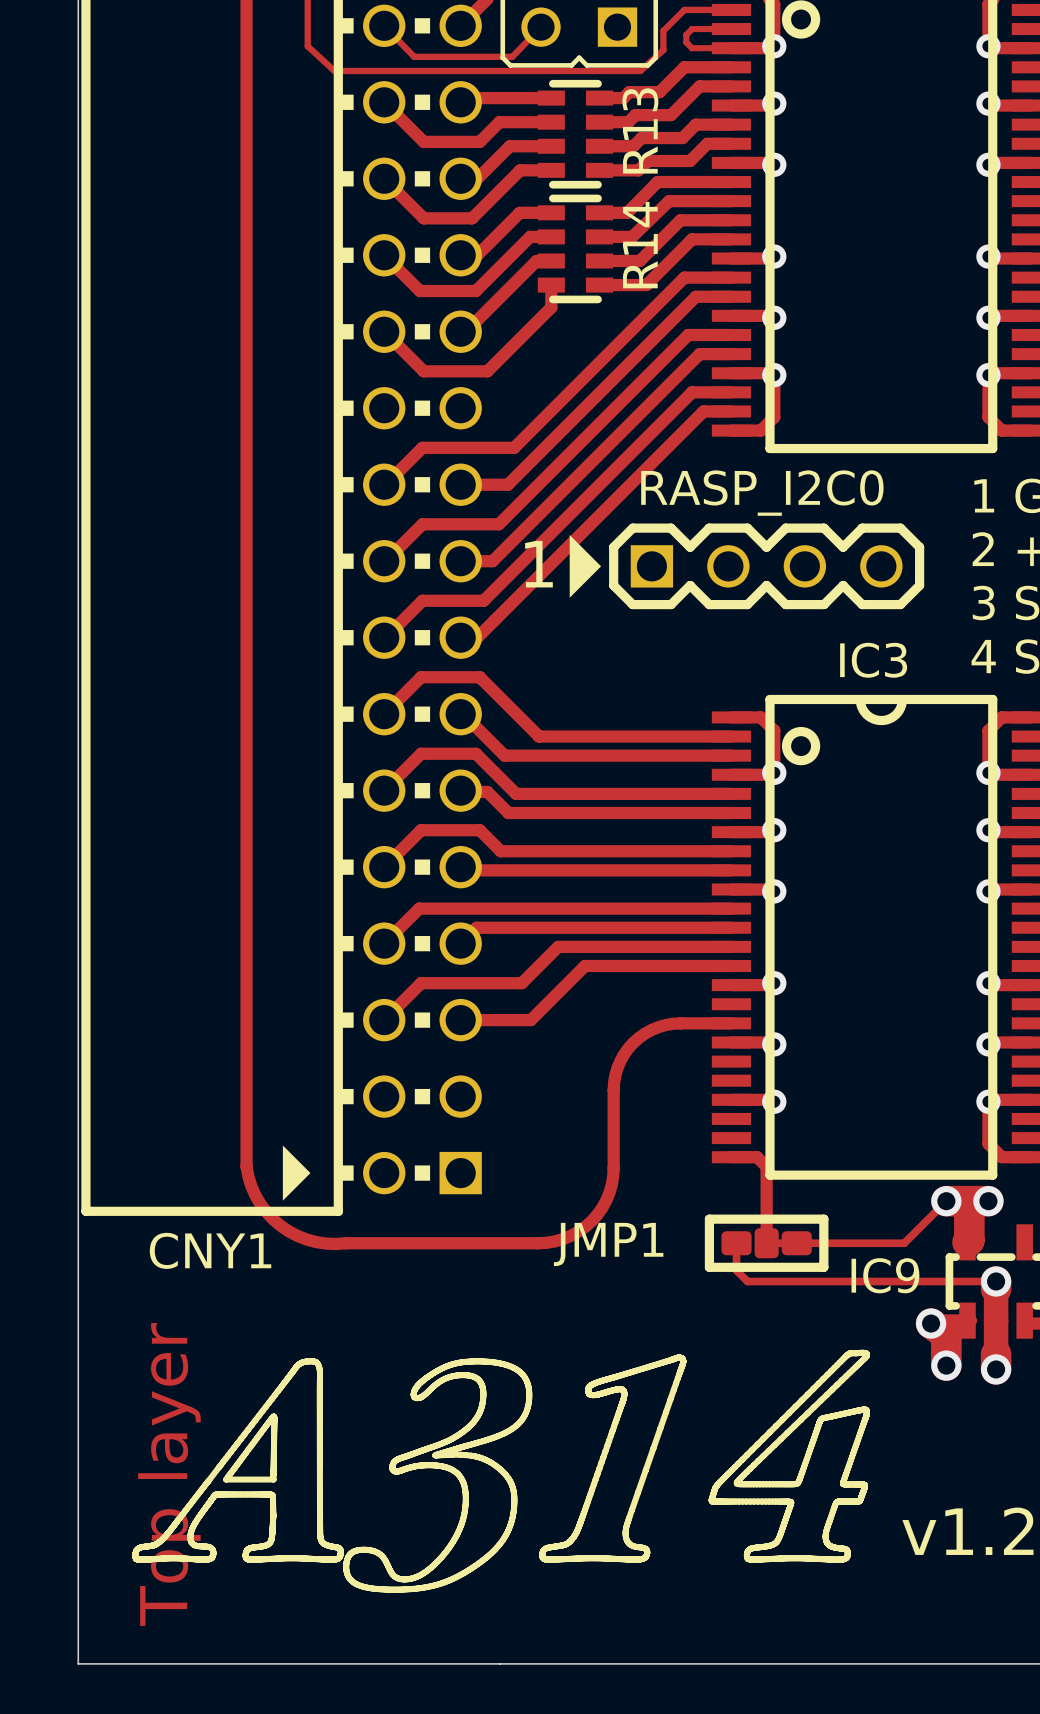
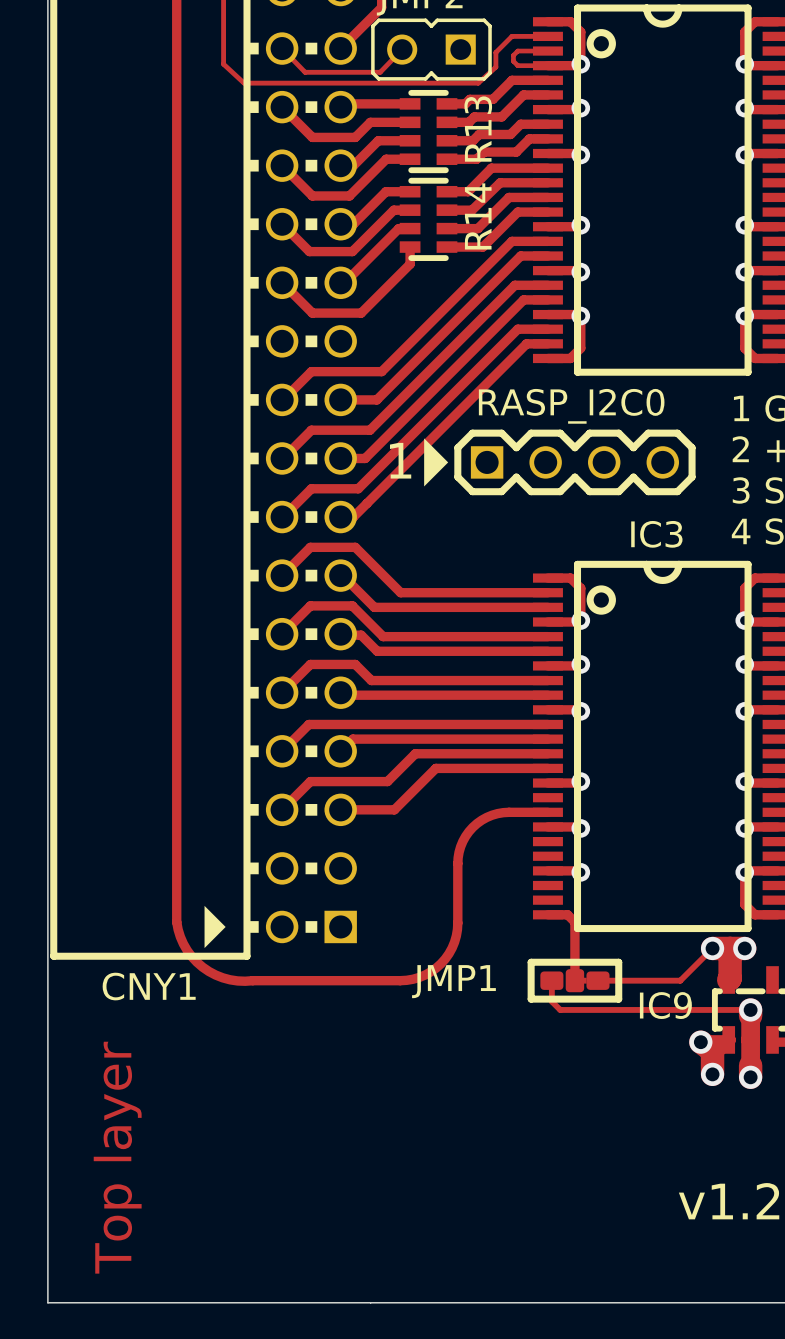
drawing: [132, 1349, 871, 1593] -> none

